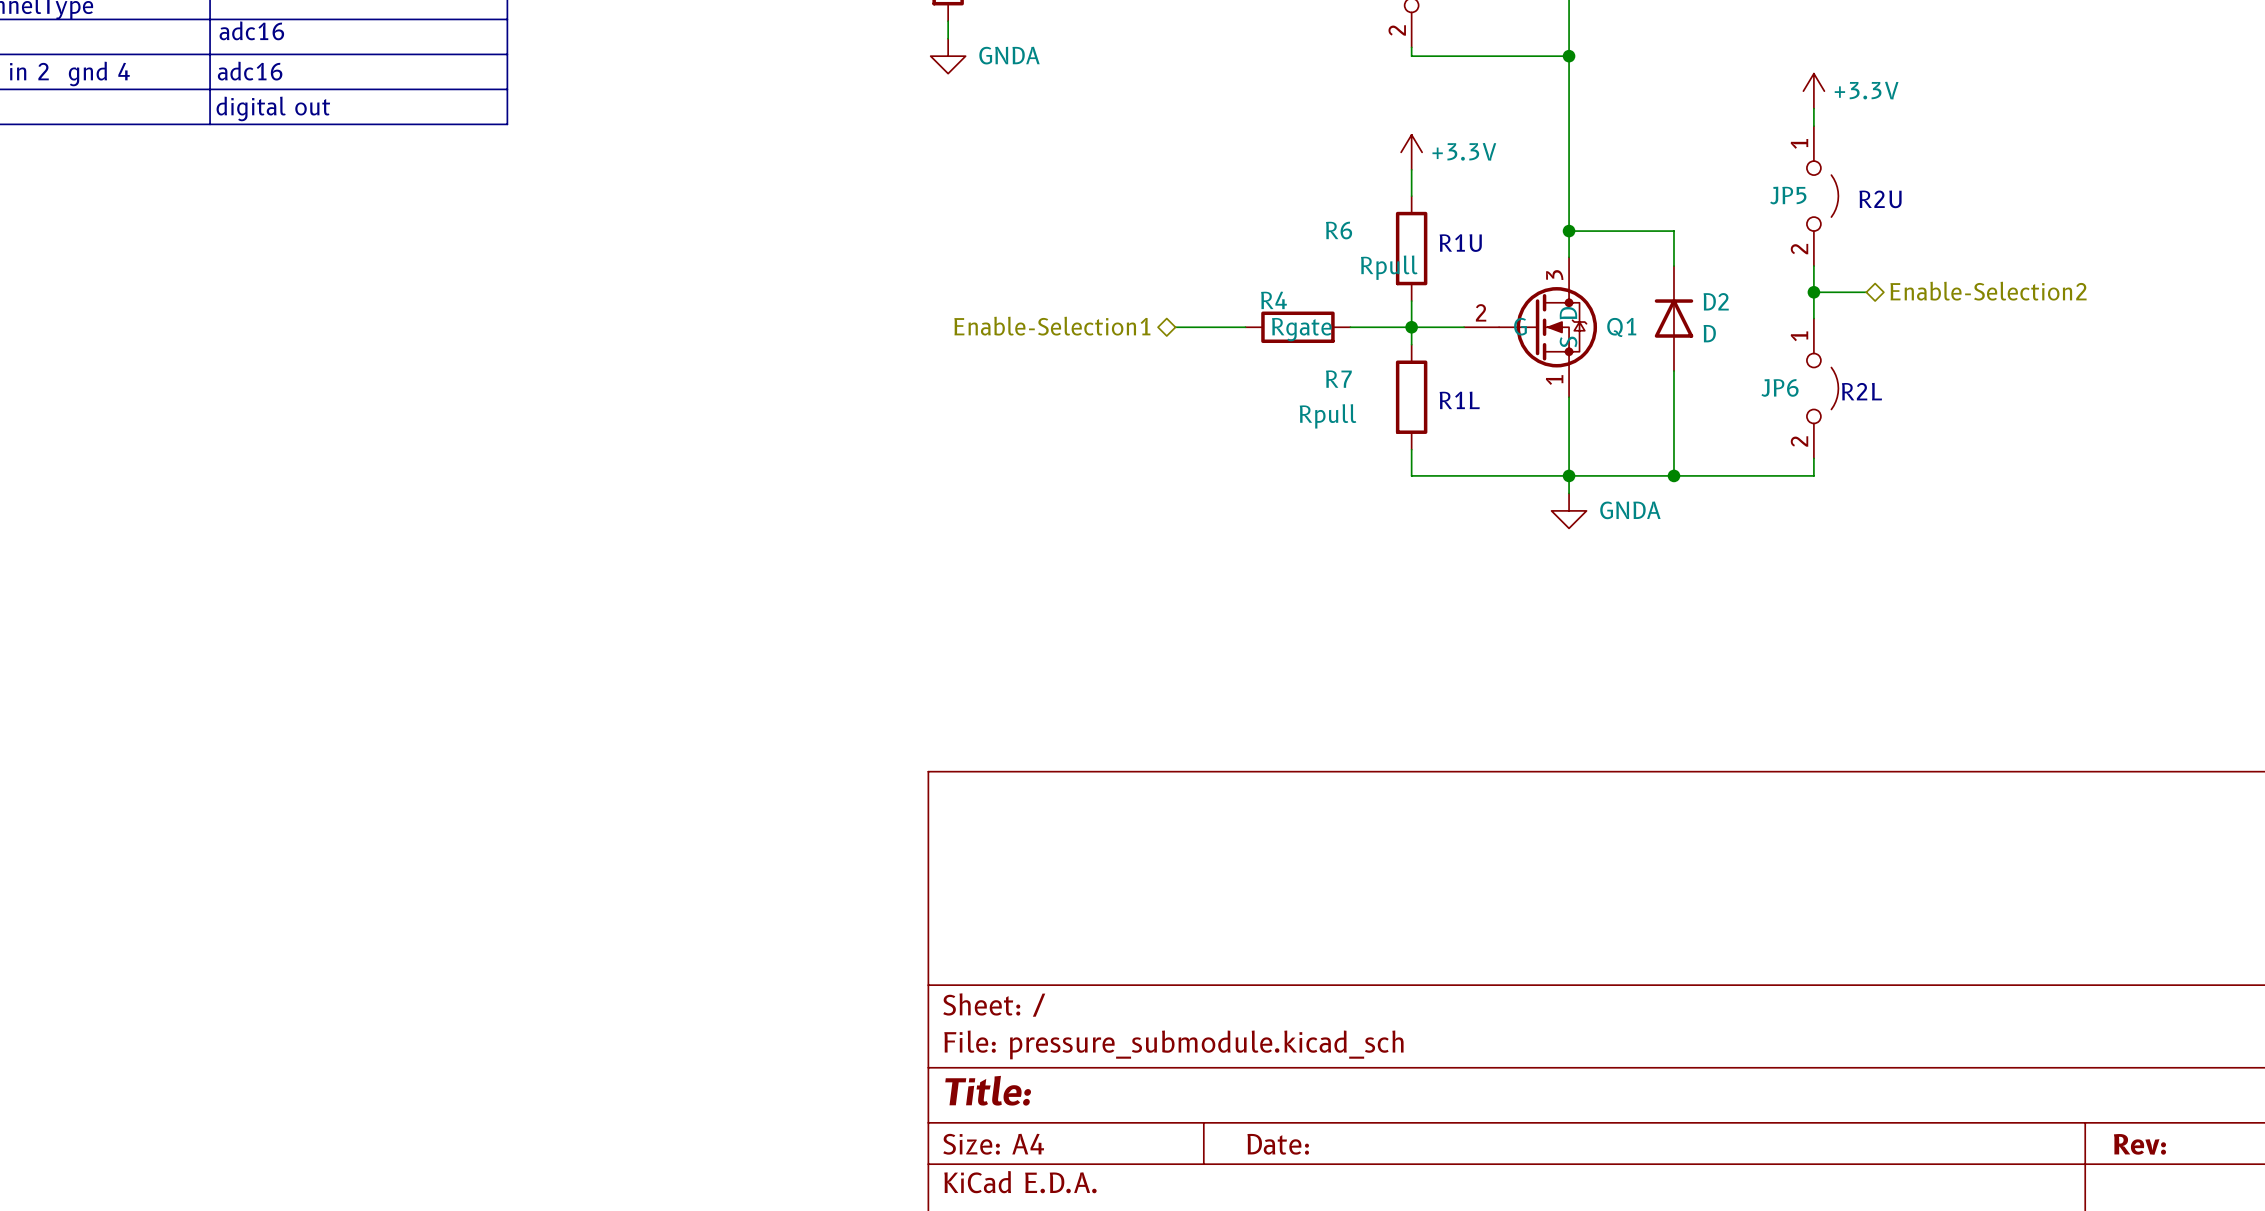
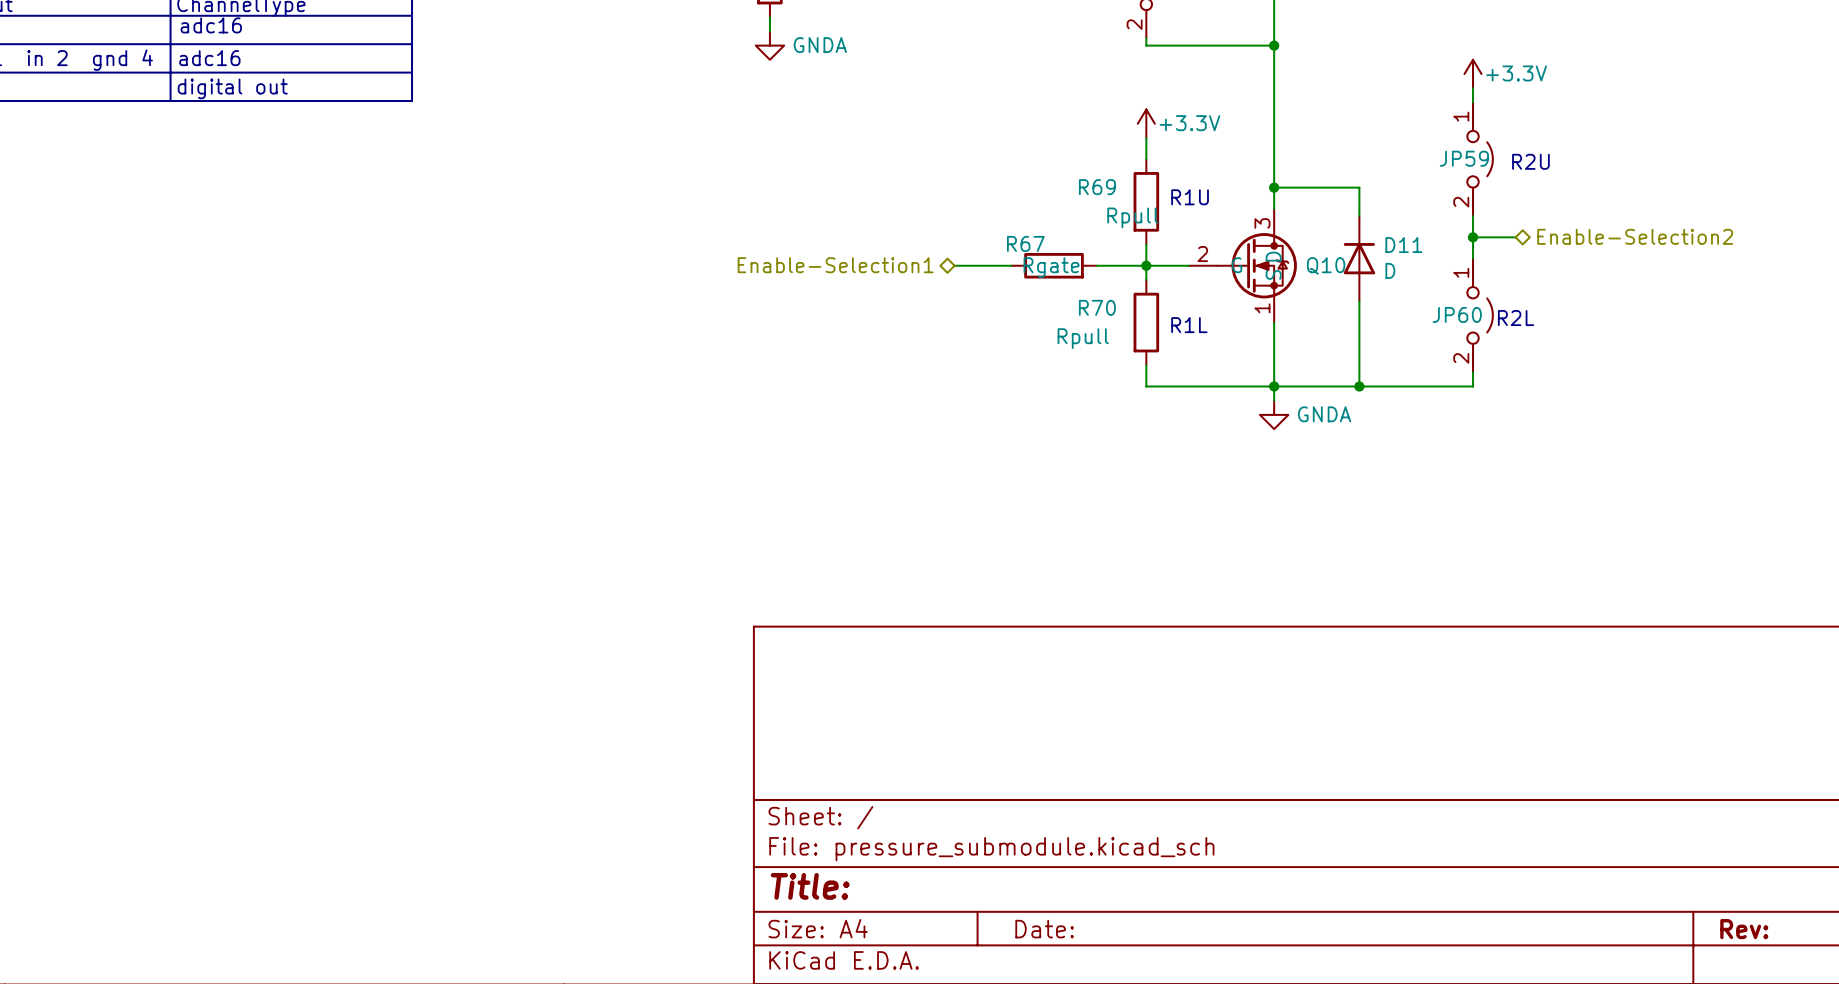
JP5 name: JP5 (1788, 195) -> JP59 (1464, 158)
R6 name: R6 (1339, 230) -> R69 (1097, 187)
R4 name: R4 (1273, 300) -> R67 (1025, 243)
D2 name: D2 (1716, 301) -> D11 (1403, 245)
Q1 name: Q1 (1621, 327) -> Q10 (1326, 265)
R7 name: R7 (1338, 379) -> R70 (1097, 307)
JP6 name: JP6 (1780, 387) -> JP60 (1457, 314)

